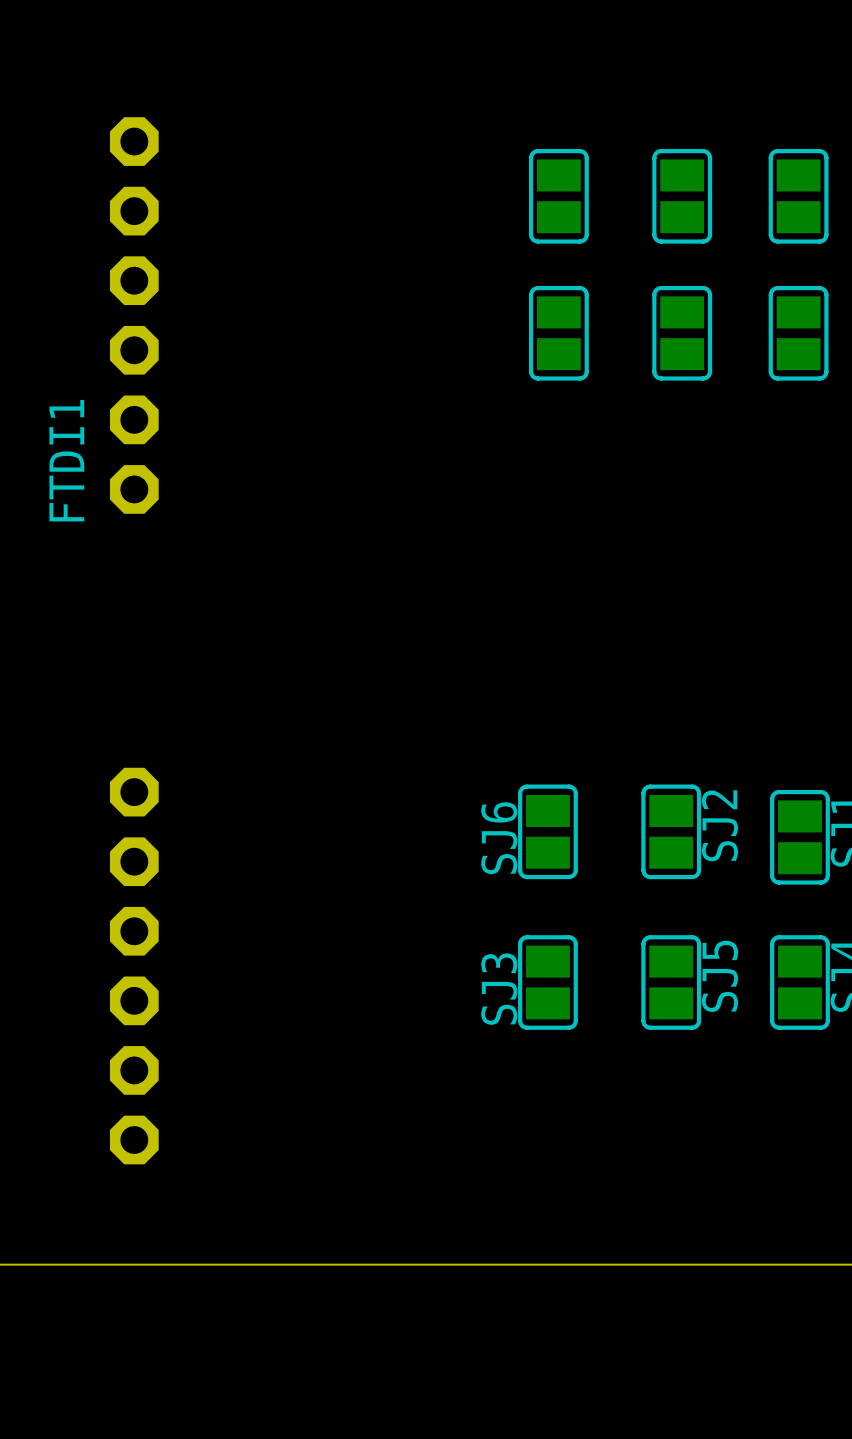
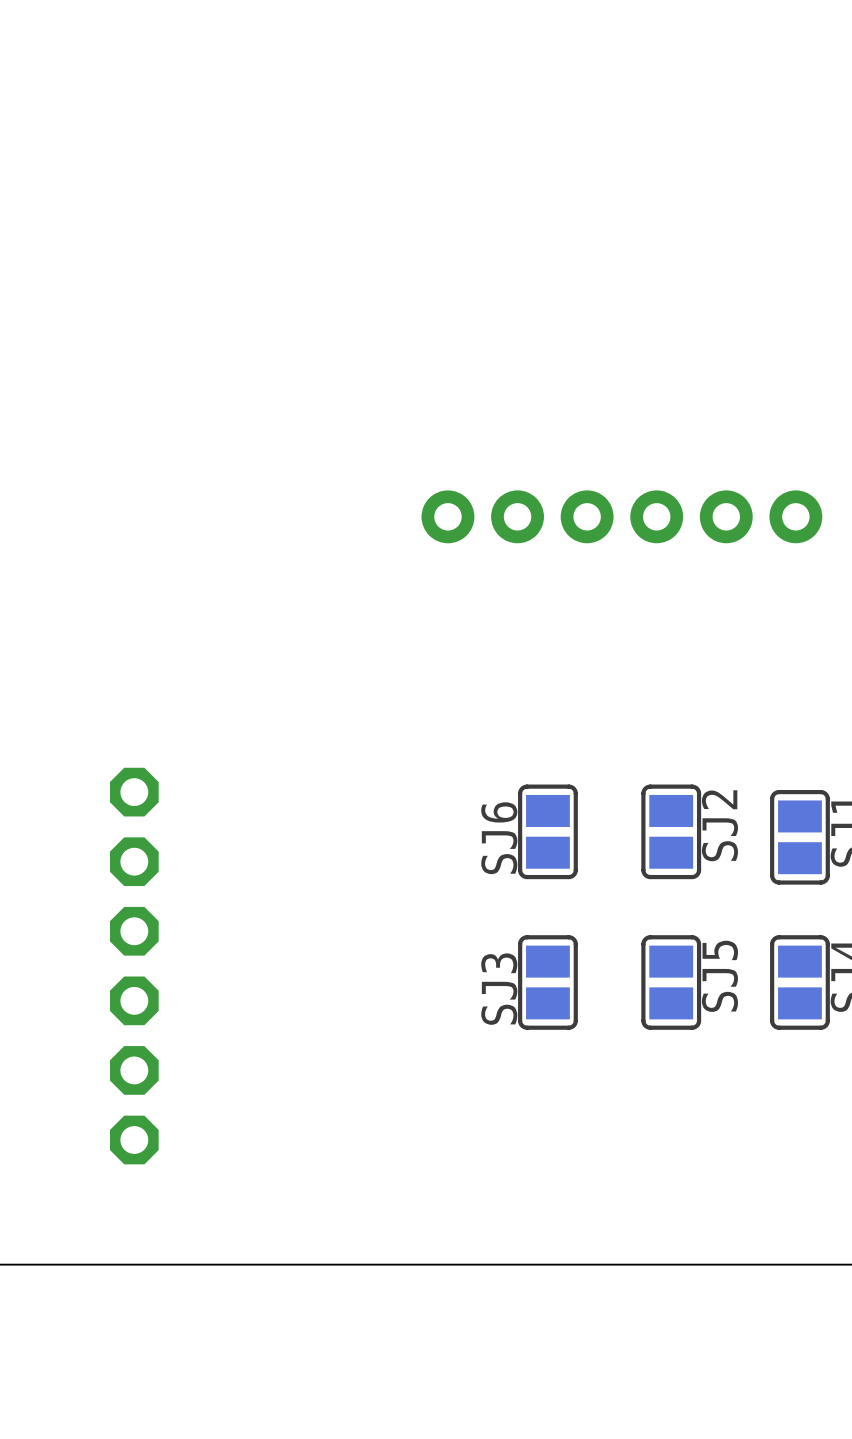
part: (558, 196) -> none
part: (682, 196) -> none
part: (798, 196) -> none
FTDI1: (134, 315) -> none
part: (558, 333) -> none
part: (682, 333) -> none
part: (798, 333) -> none
part: none -> (621, 516)

